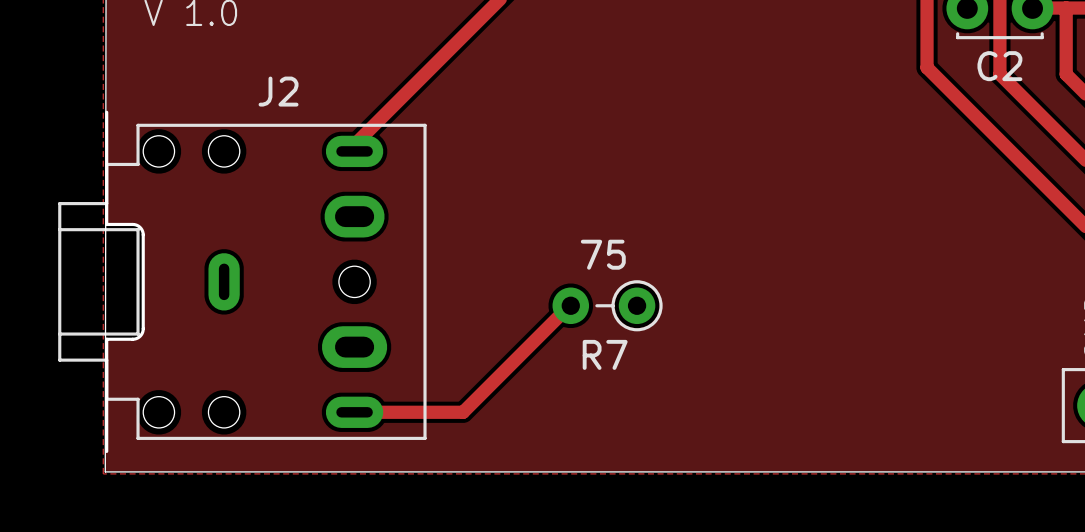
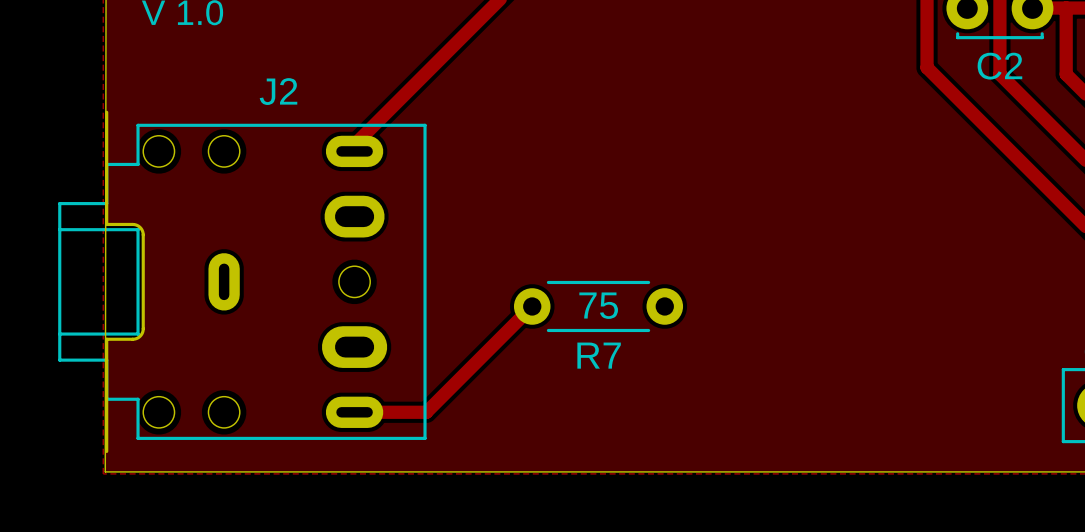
R7 footprint: [552, 280, 663, 332] -> [513, 280, 684, 333]
track: (569, 306) (463, 412) (426, 412) -> (532, 306) (426, 412)

